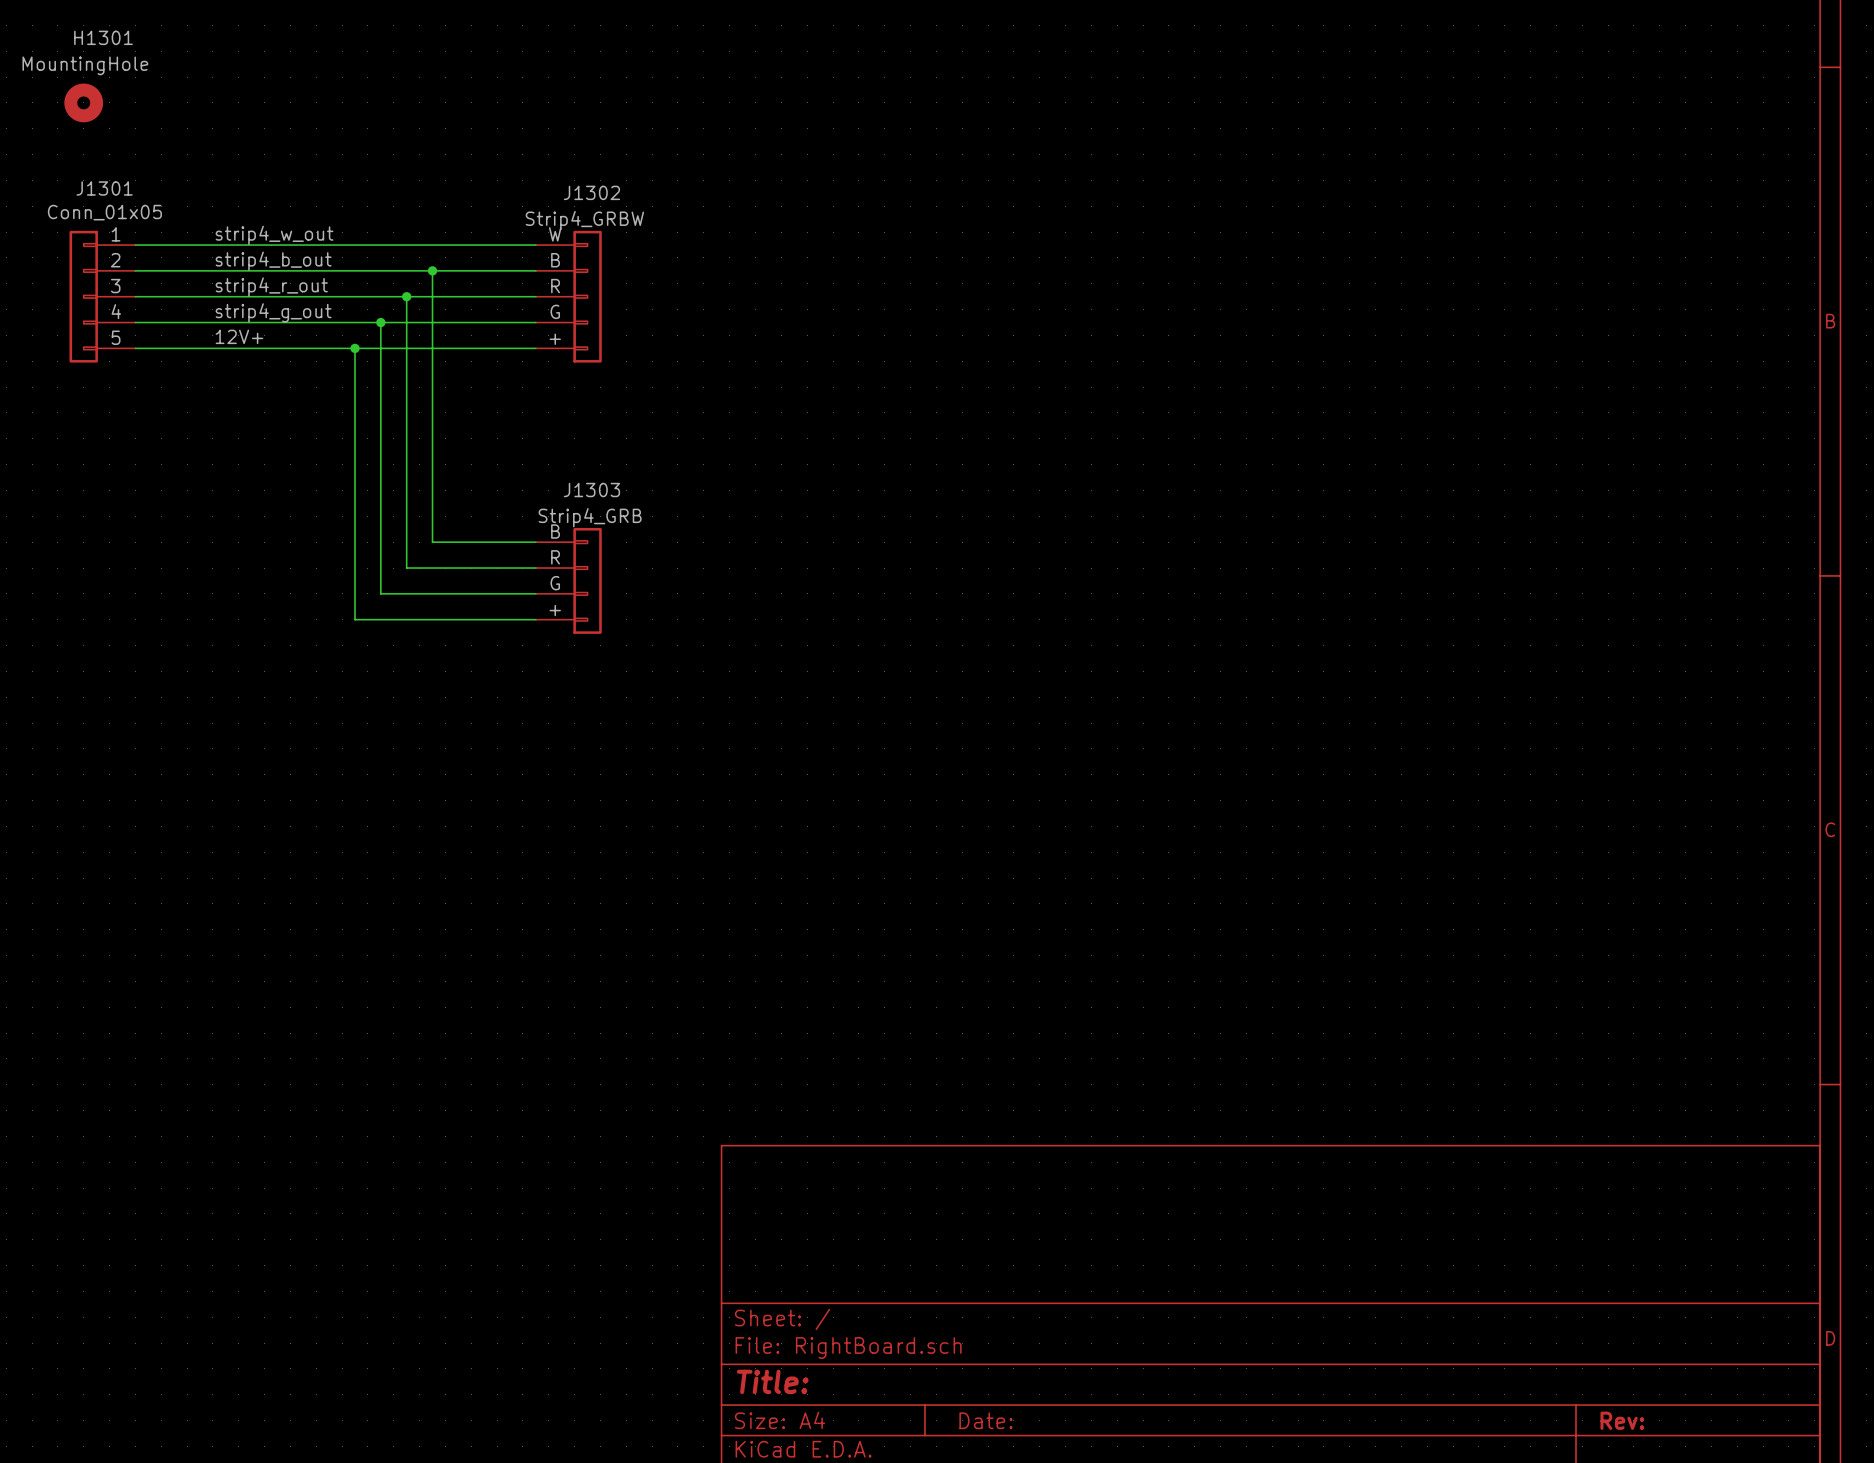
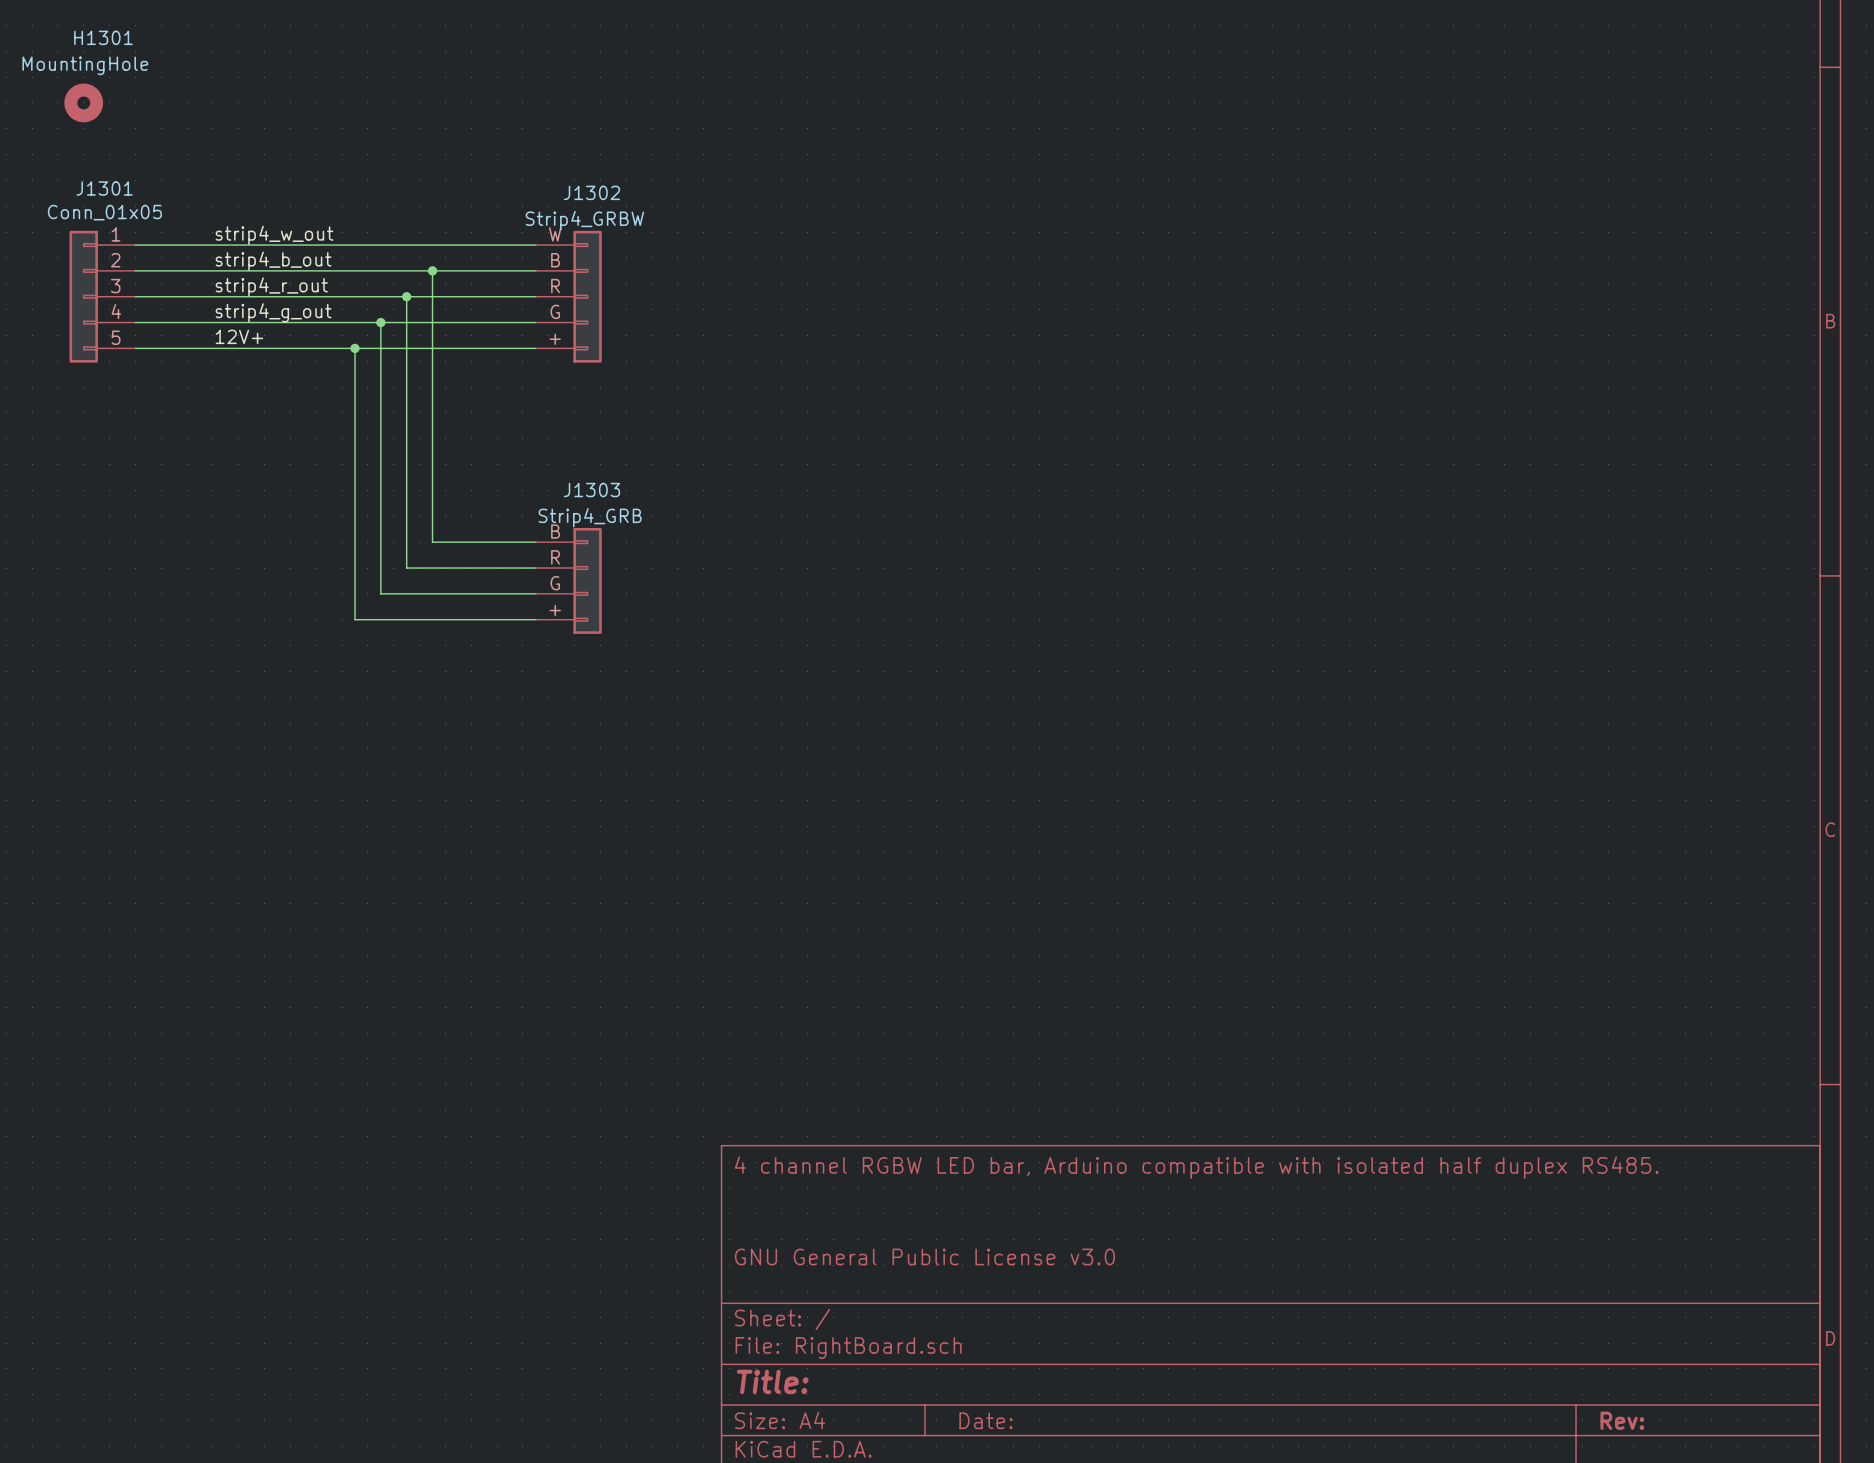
title block: none -> 4 channel RGBW LED bar, Arduino compatible with isolated half duplex RS485. (1196, 1167)
title block: none -> GNU General Public License v3.0 (924, 1256)

